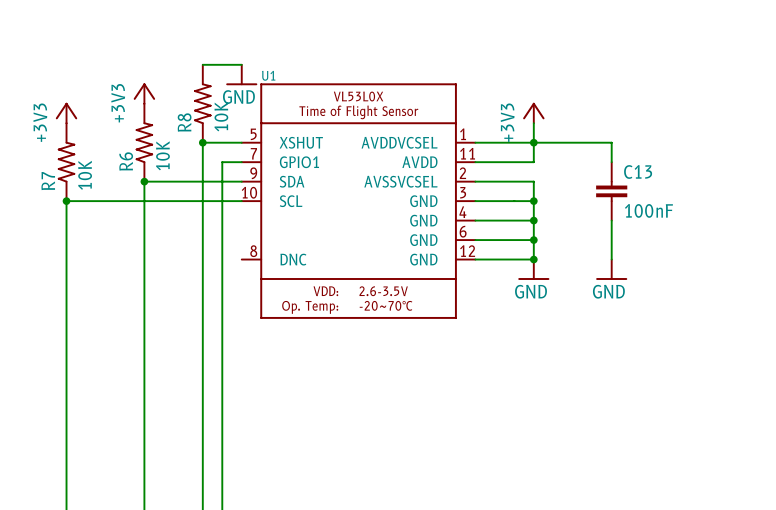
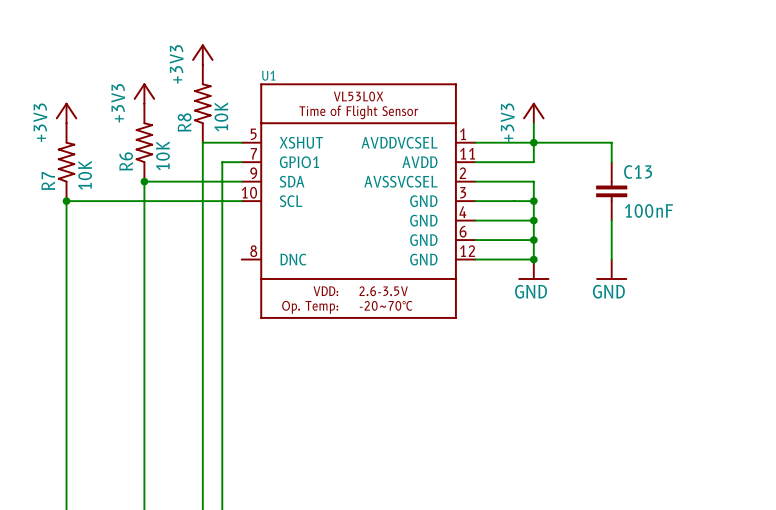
power symbol: none -> +3V3 (202, 54)
wire: (202, 64) (241, 64) -> none
power symbol: GND (241, 75) -> none
junction: (202, 142) -> none

